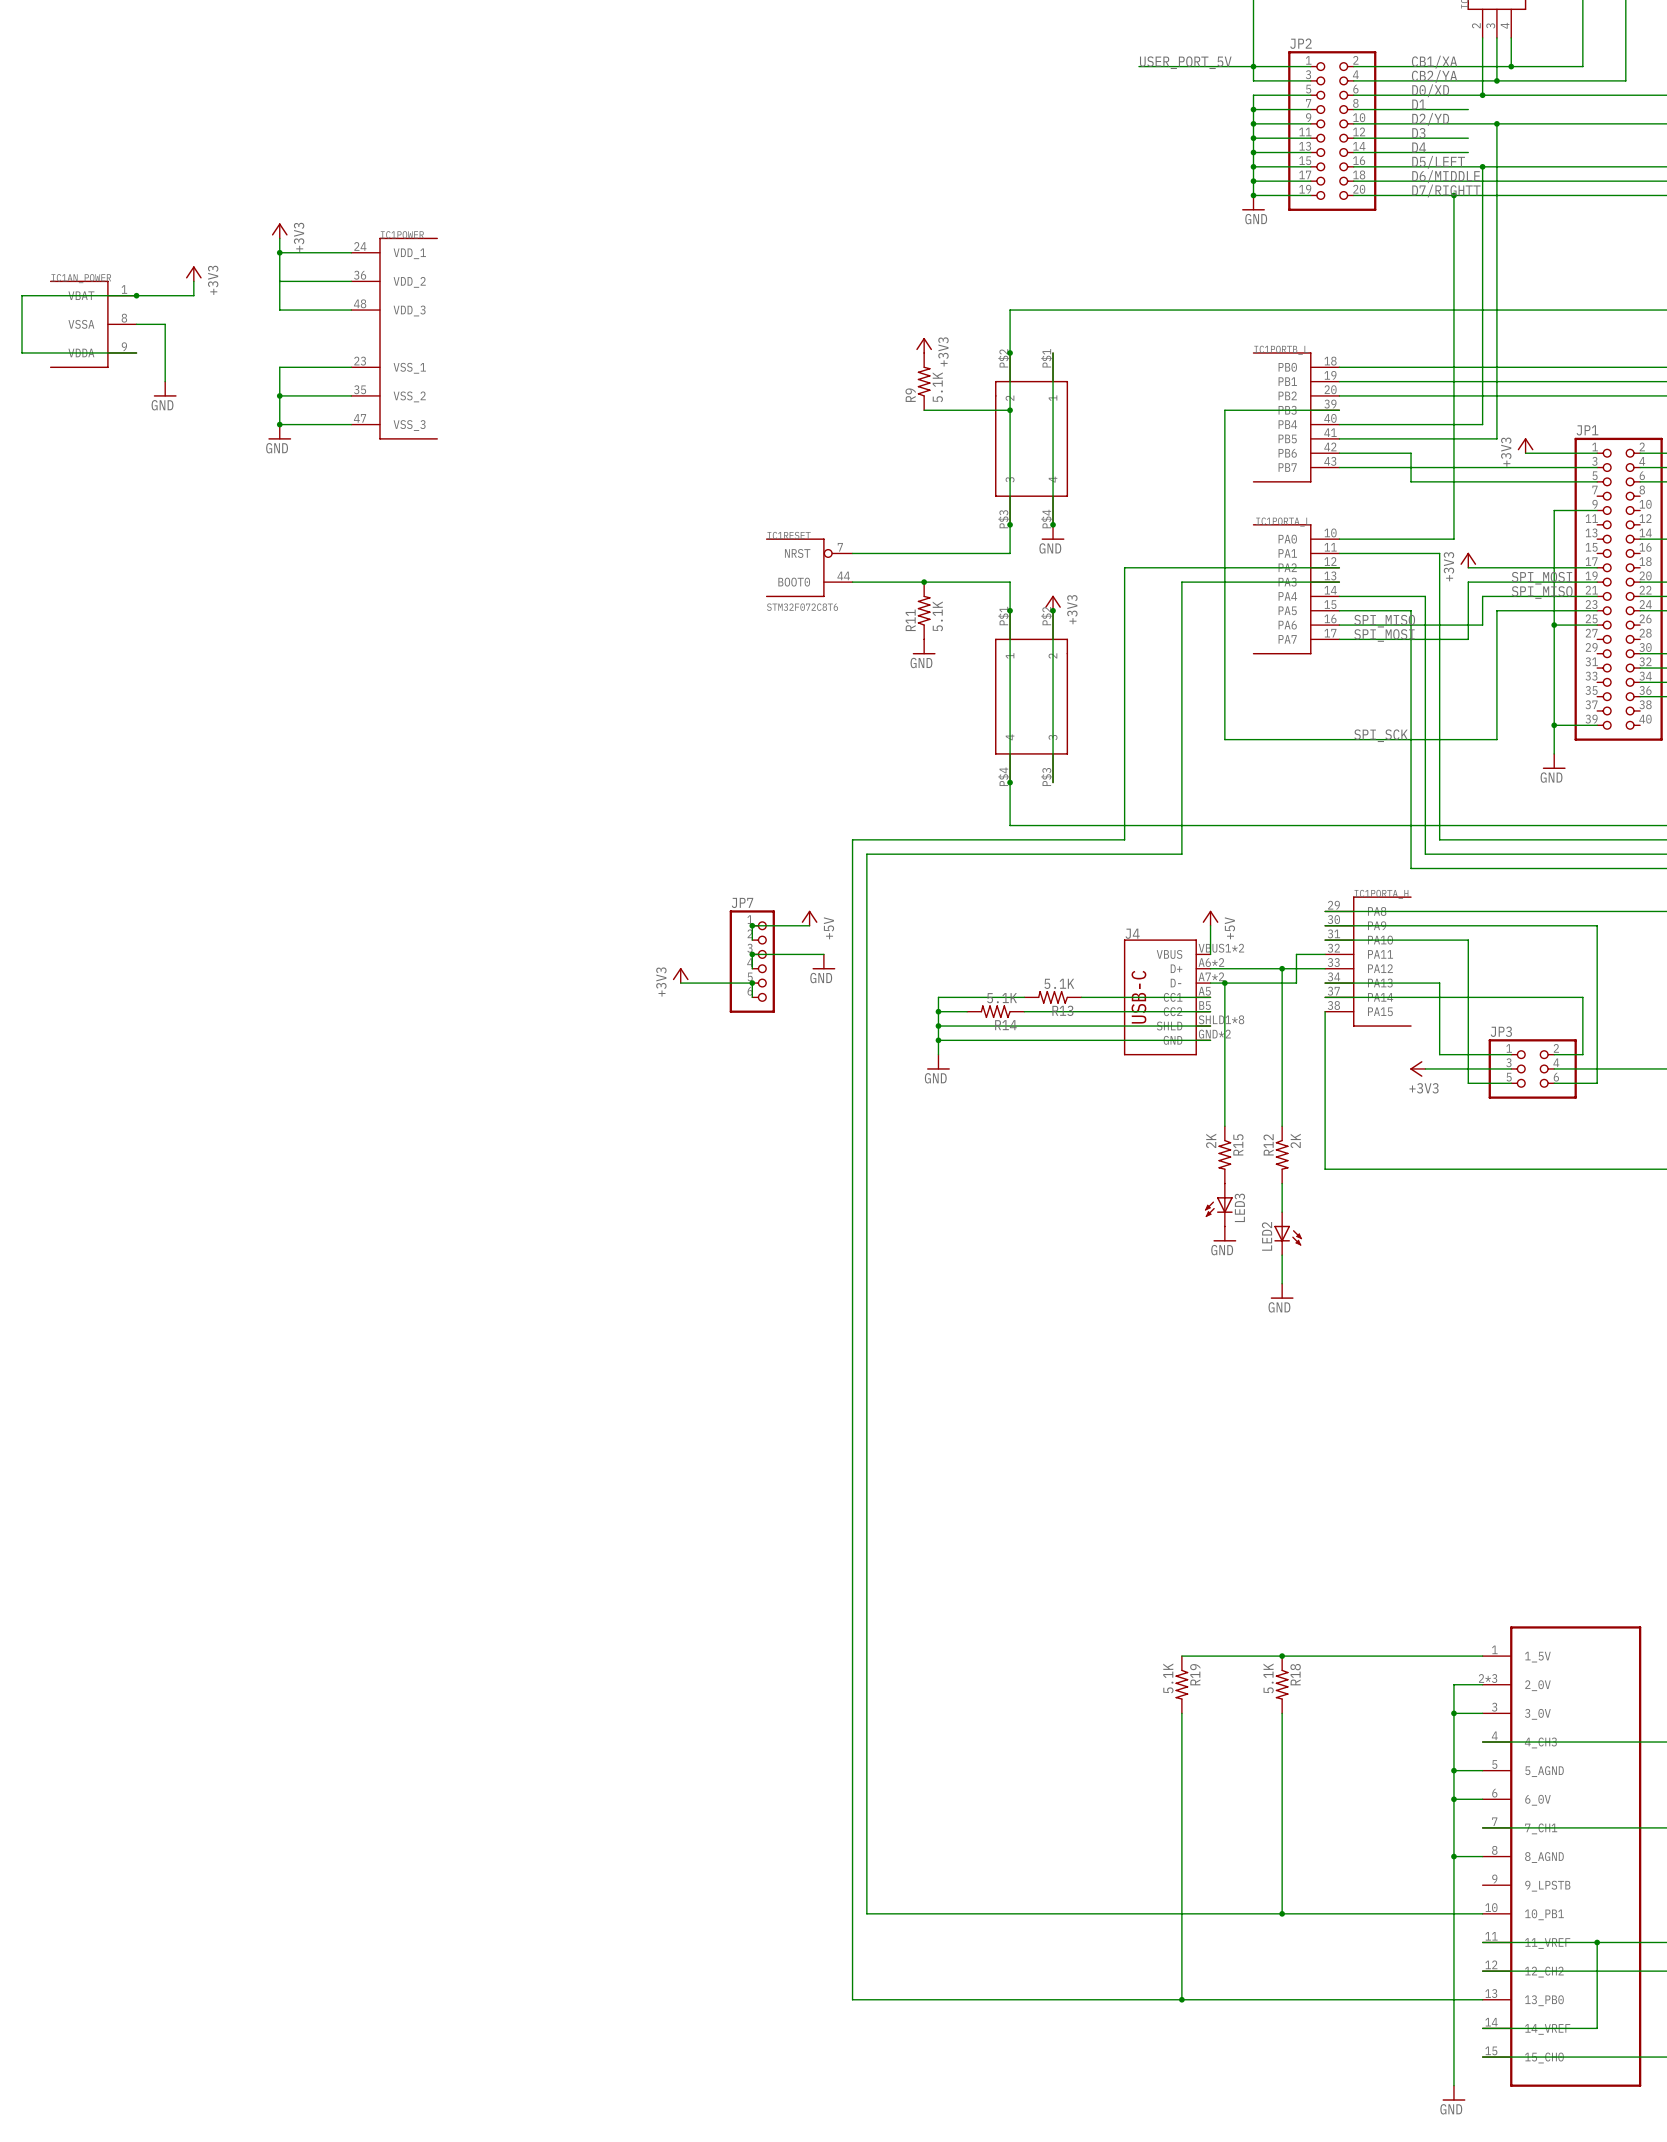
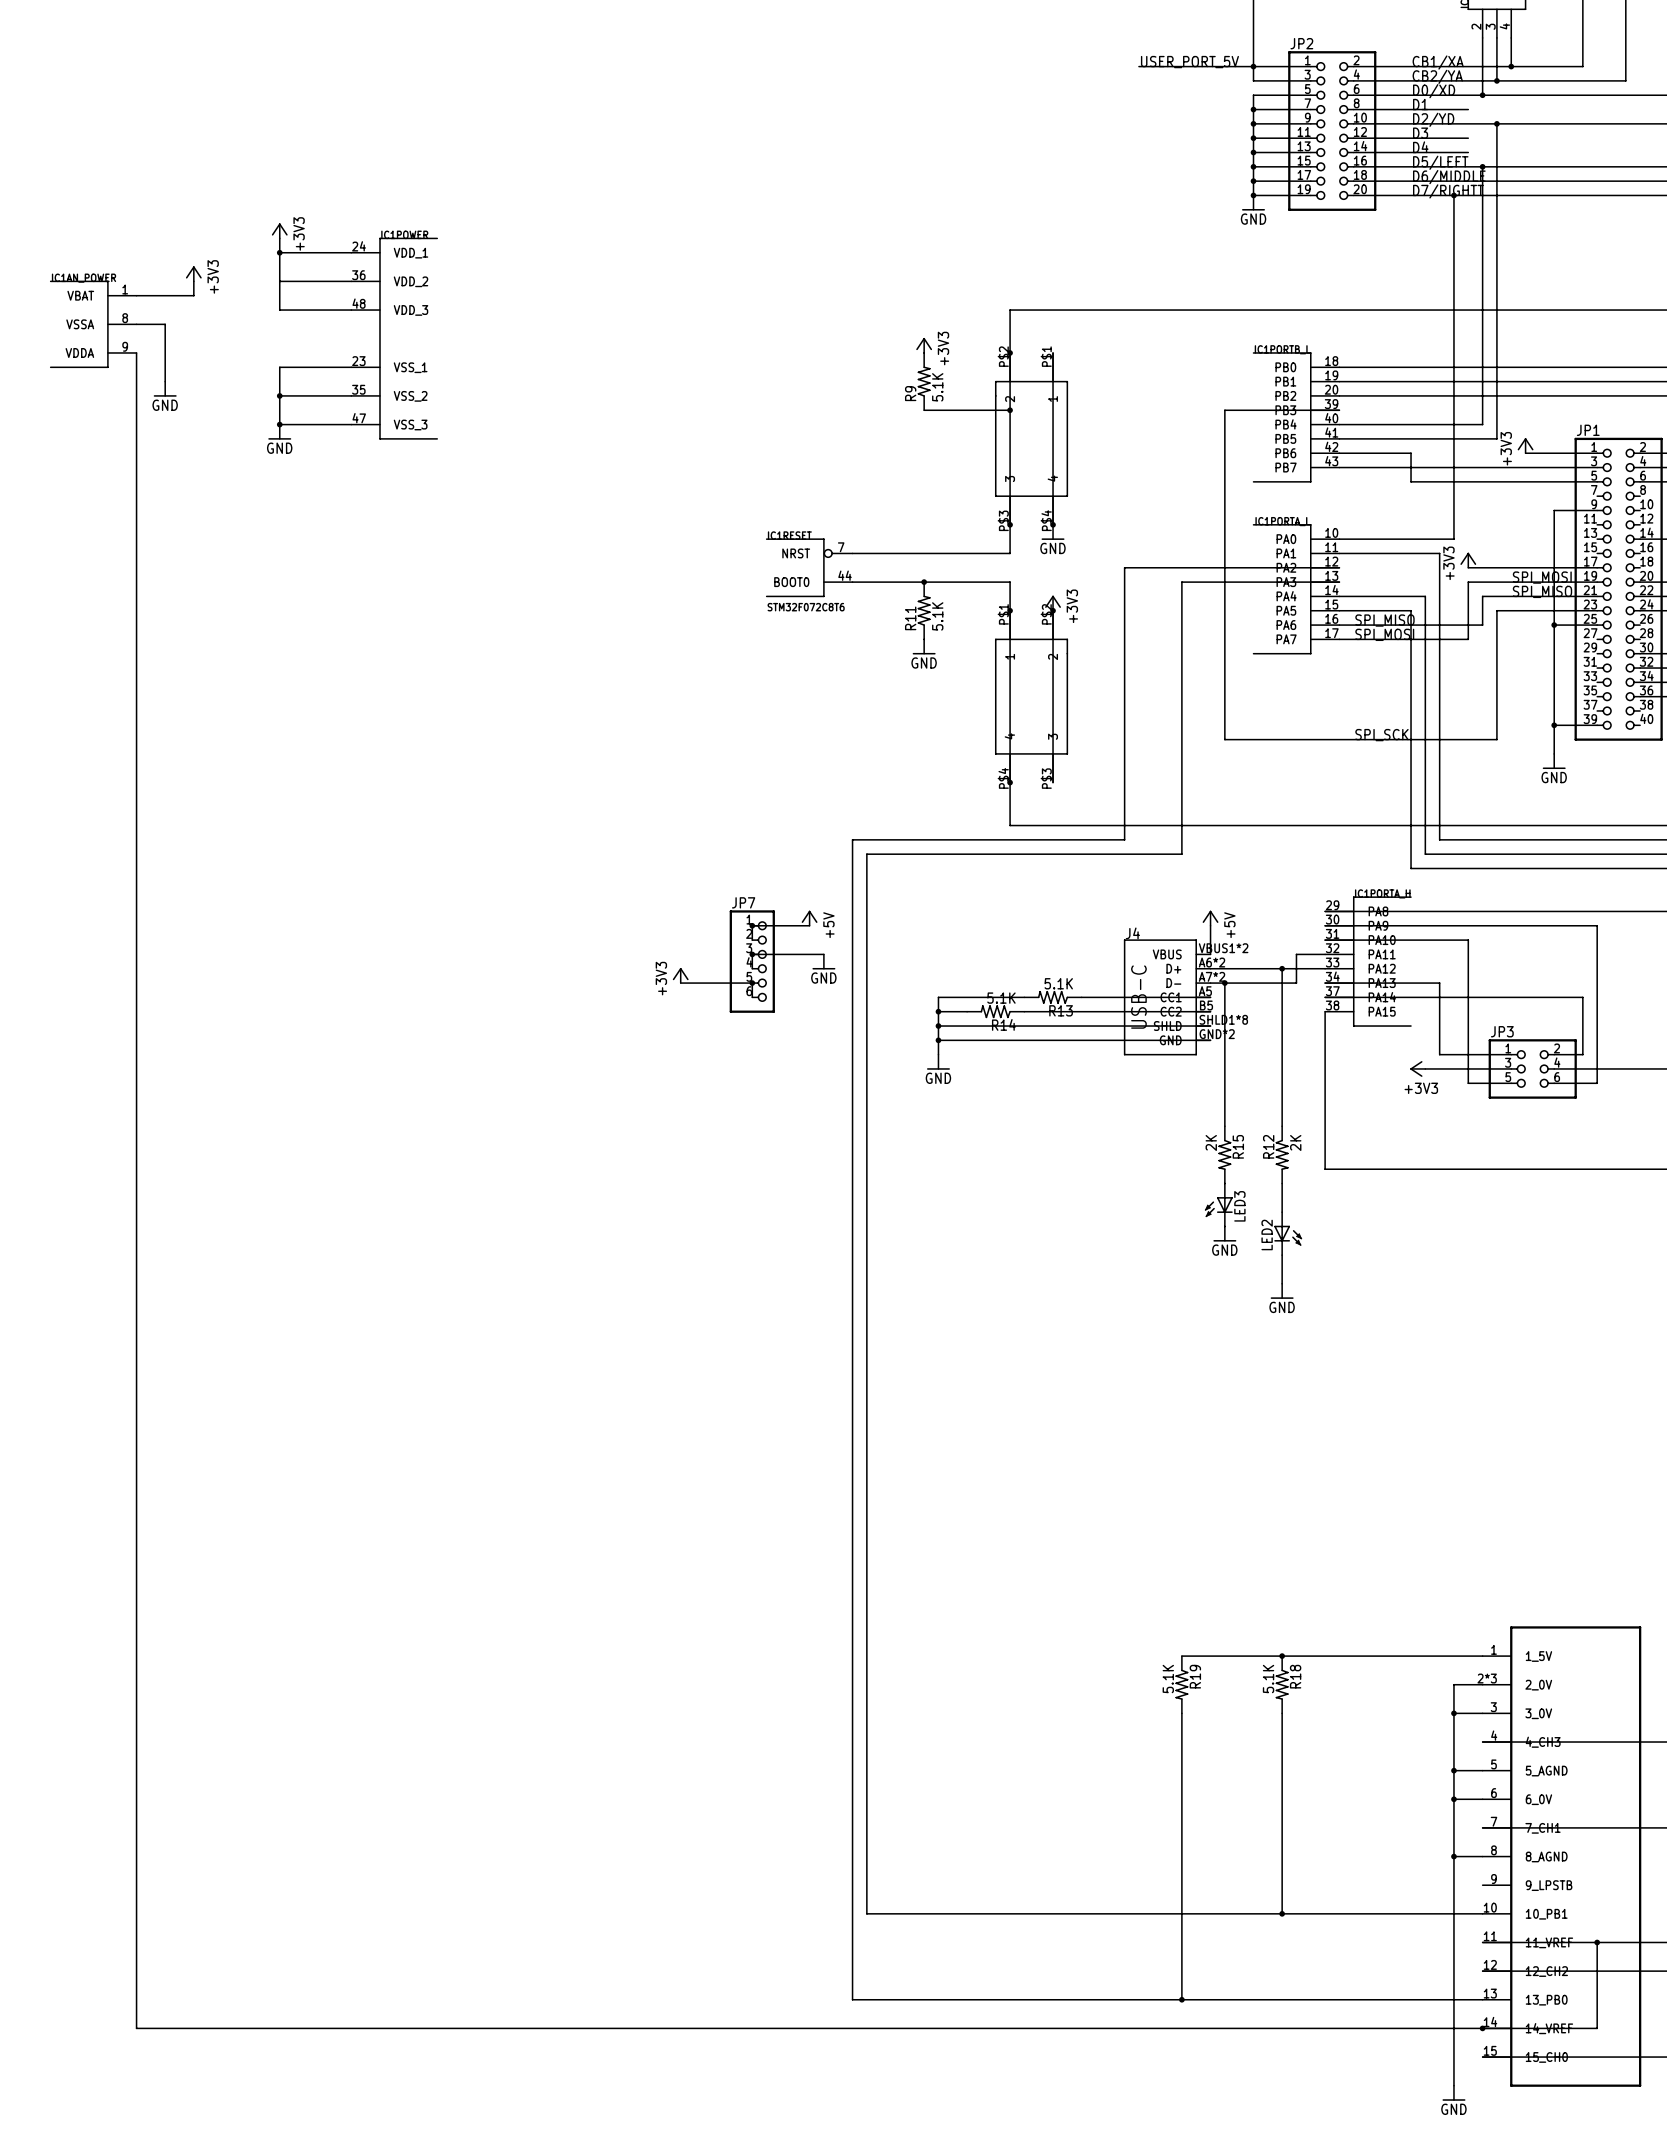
wire: (136, 295) (22, 295) (22, 352) (136, 352) -> (1482, 2028) (136, 2028) (136, 352)
junction: (136, 295) -> none
junction: none -> (1482, 2028)

